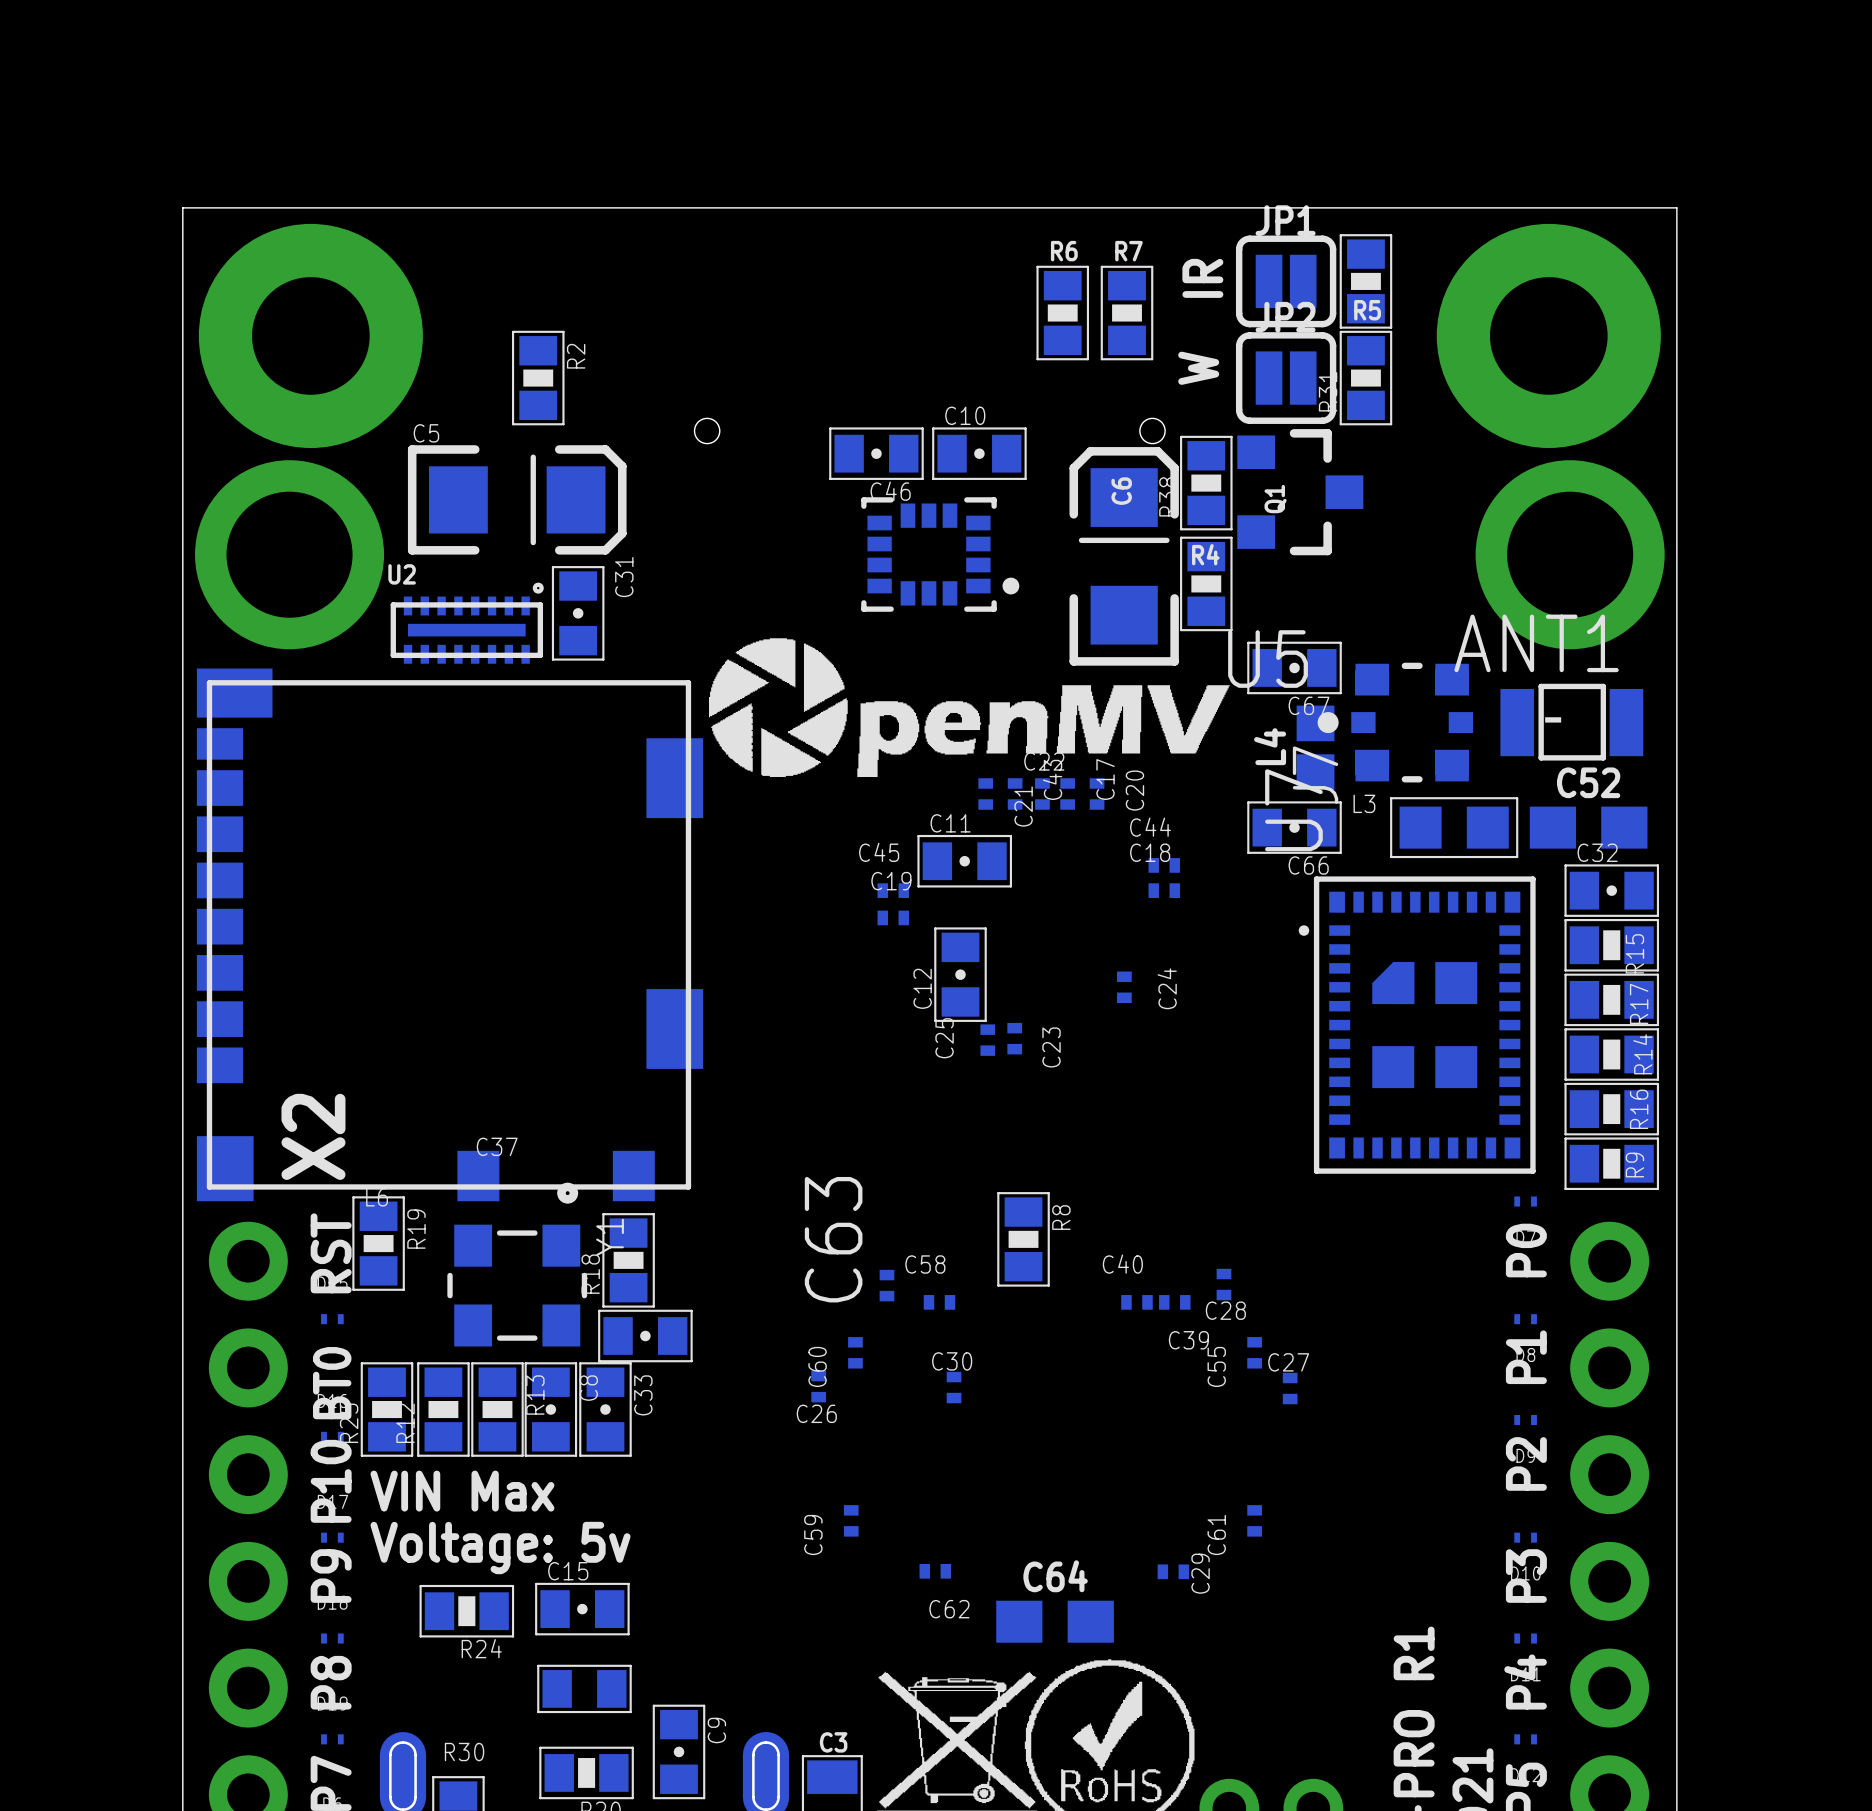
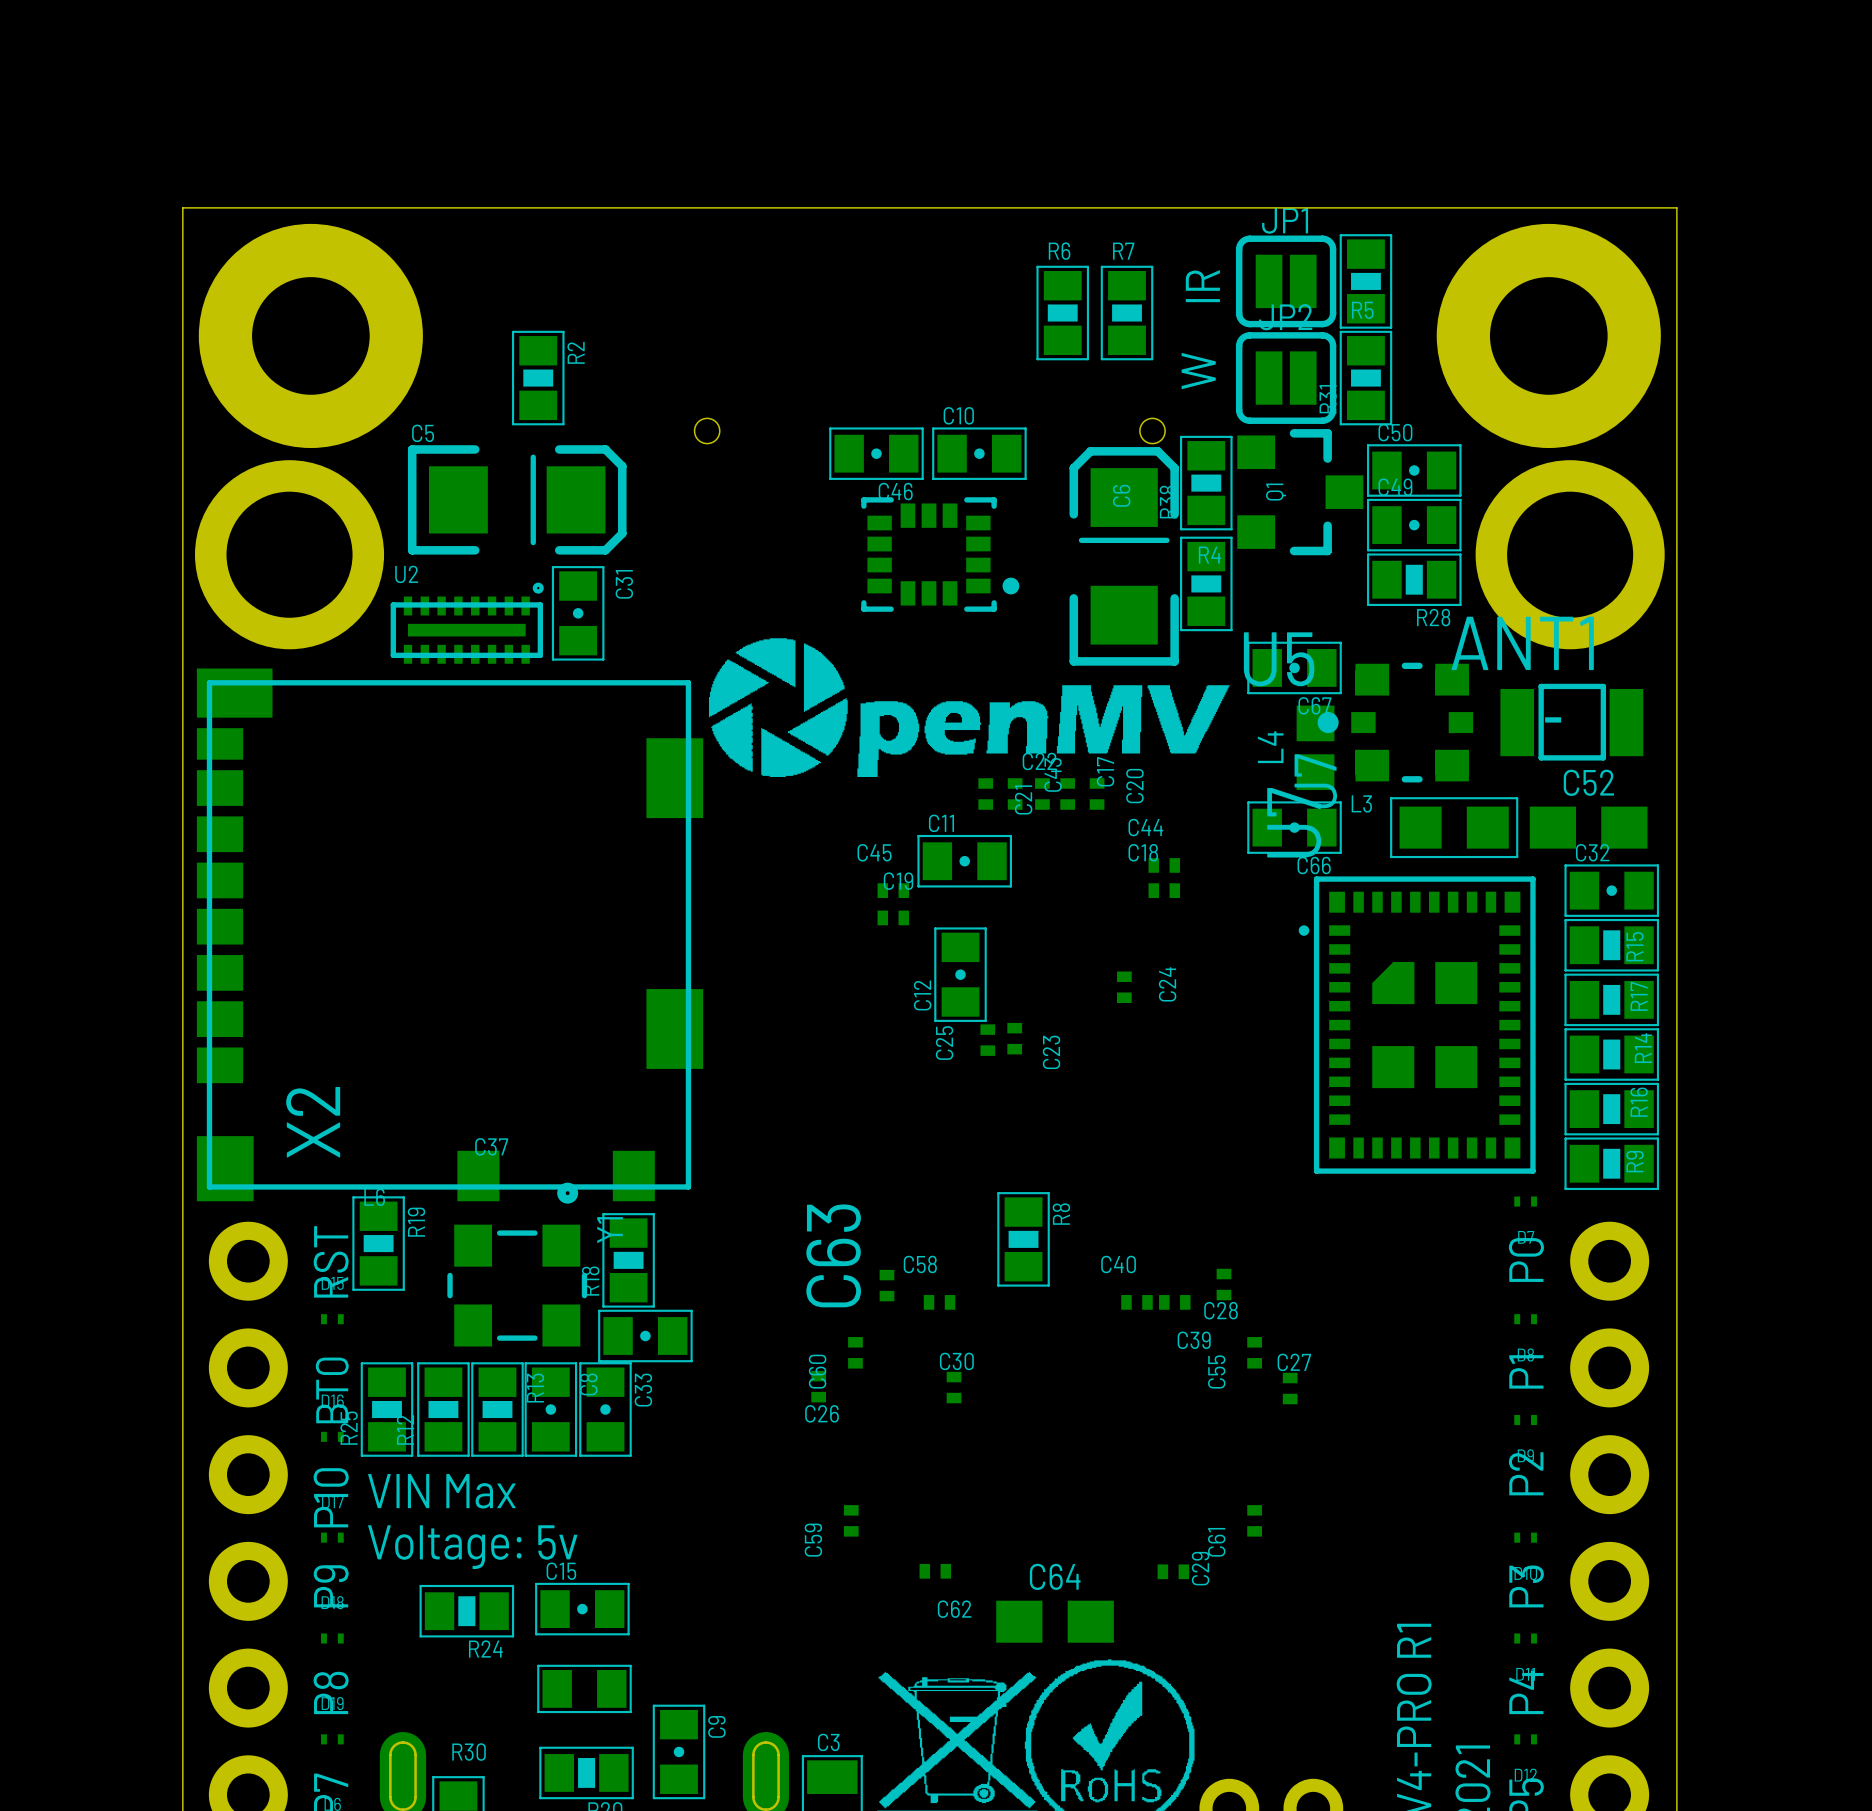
C50: none -> (1414, 470)
C49: none -> (1414, 525)
R28: none -> (1414, 579)

